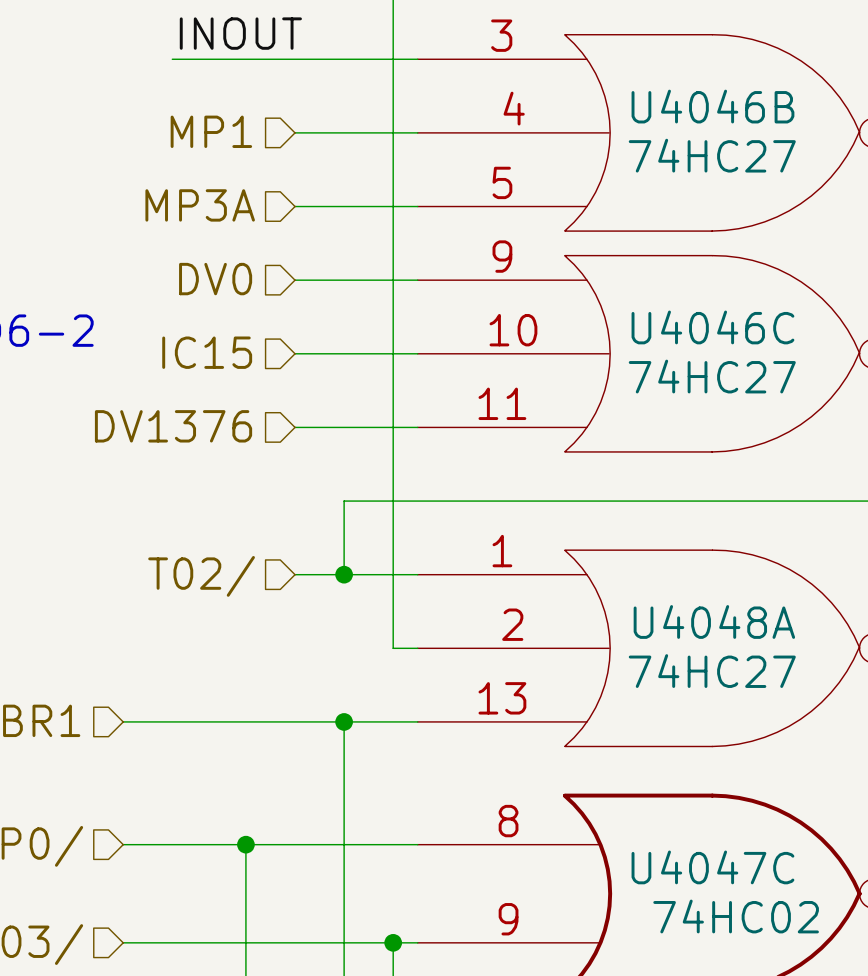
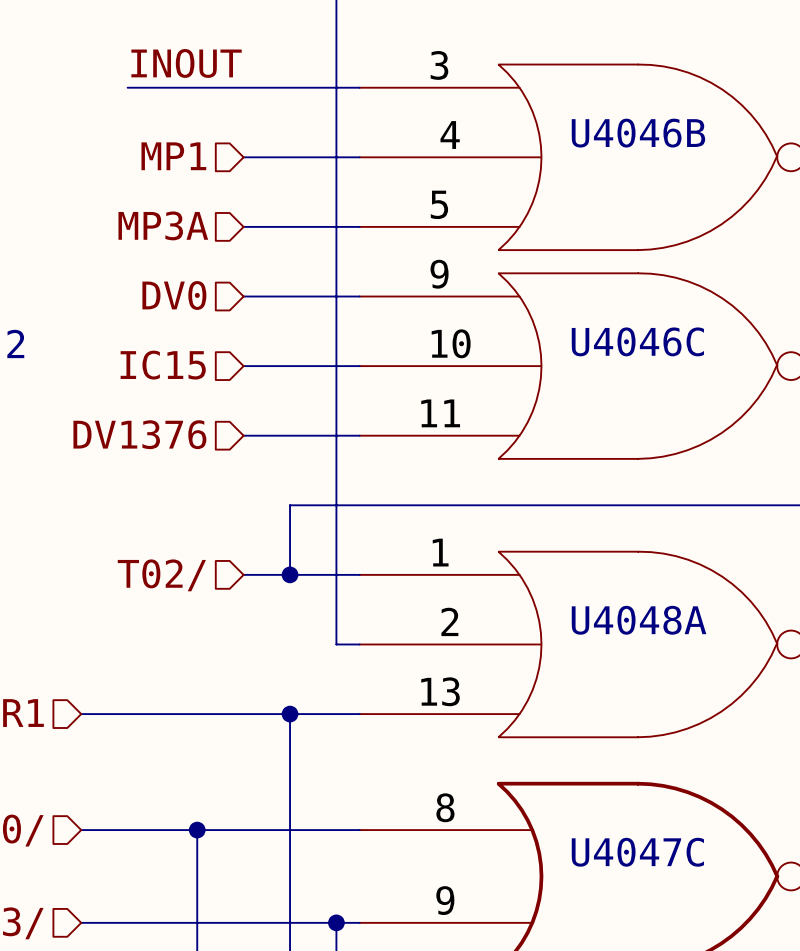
U4046B value: 74HC27 (712, 155) -> none
U4046C value: 74HC27 (712, 376) -> none
U4048A value: 74HC27 (712, 671) -> none
U4047C value: 74HC02 (736, 916) -> none

